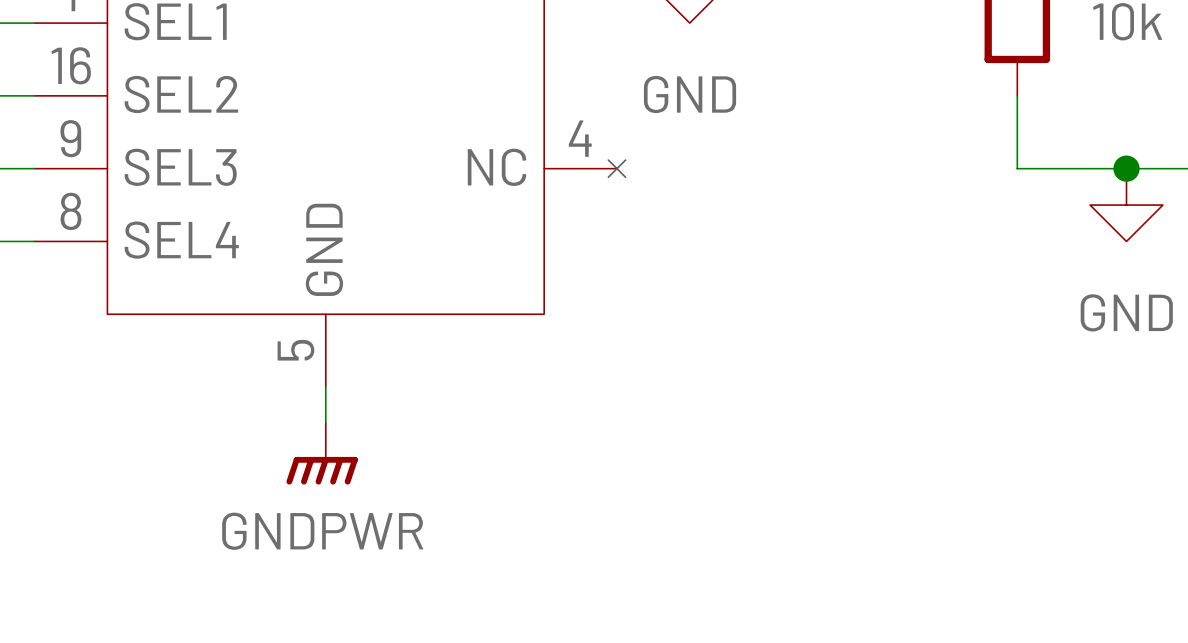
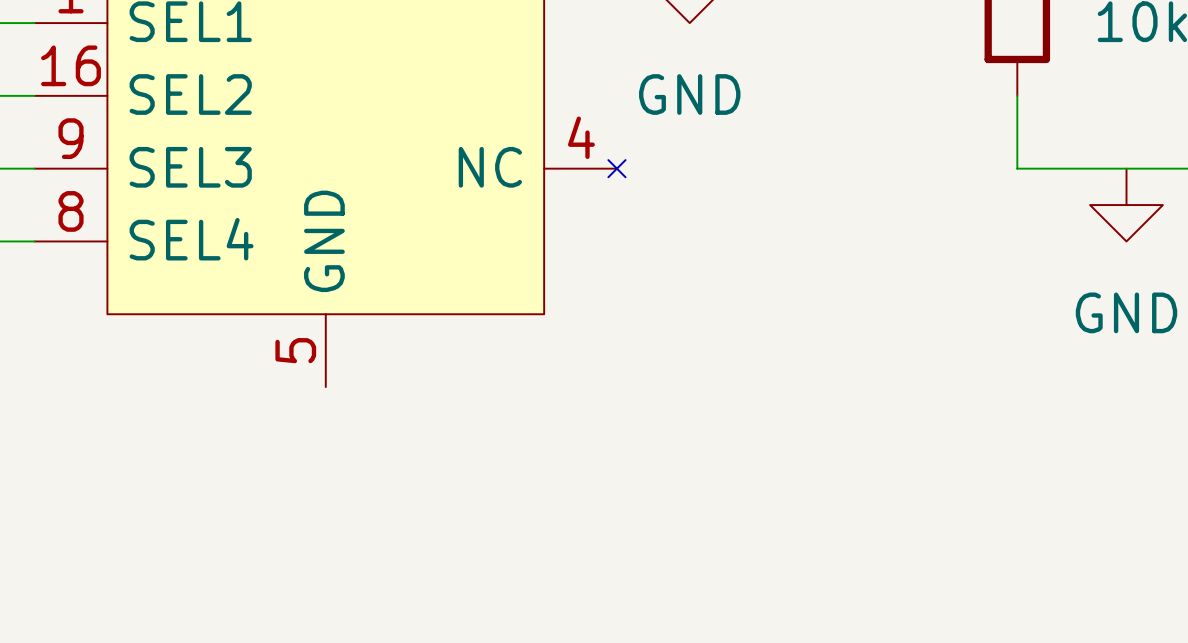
junction: (1126, 168) -> none
wire: (325, 387) (325, 423) -> none
power symbol: GNDPWR (322, 454) -> none

